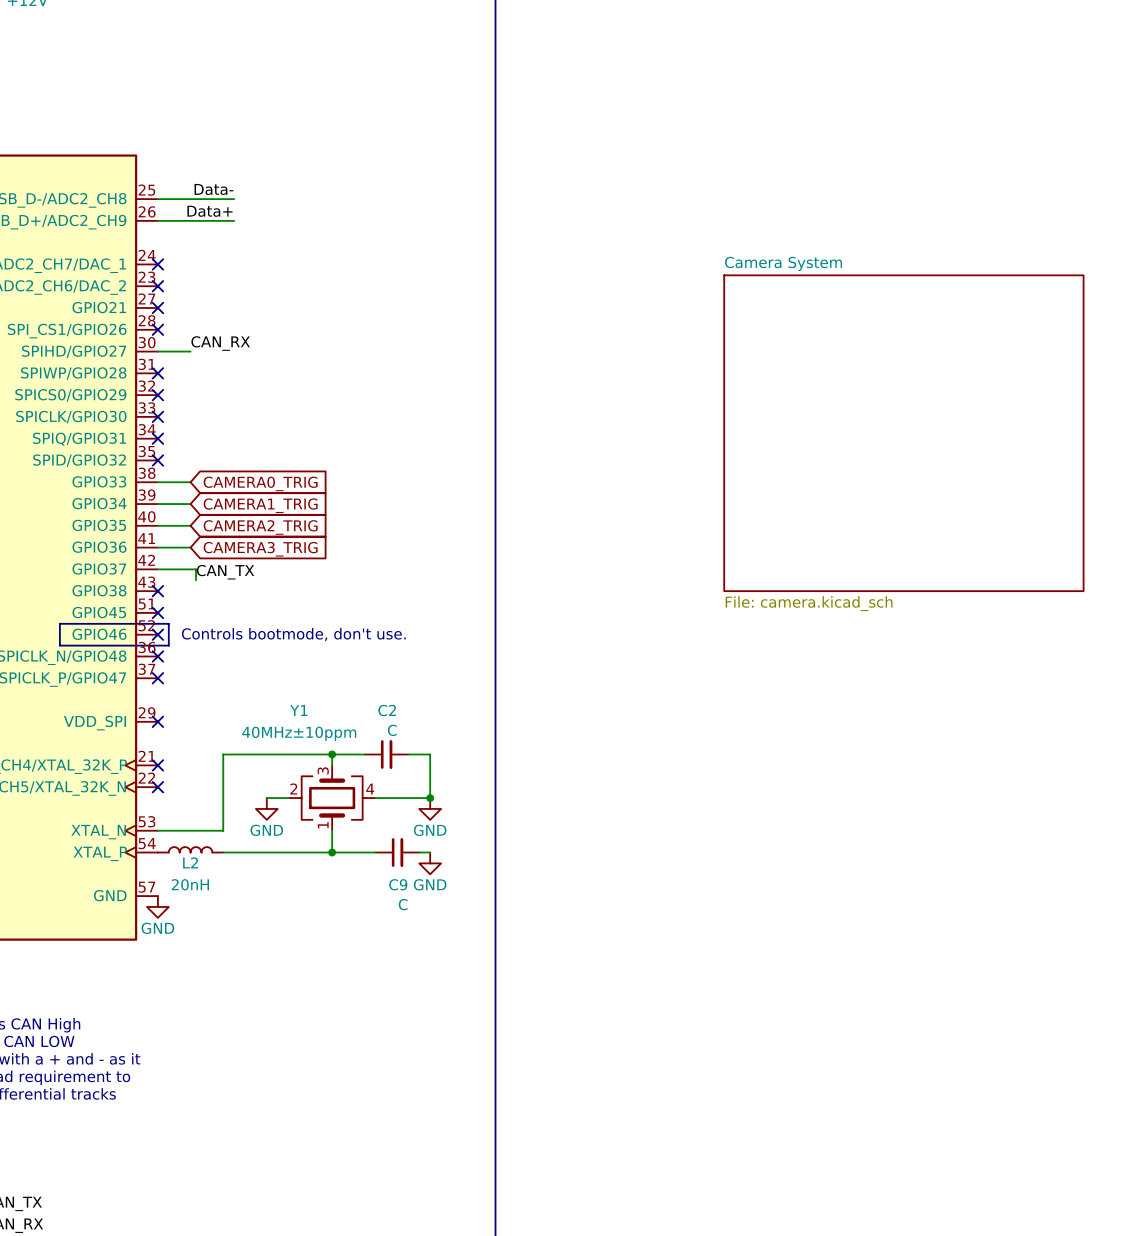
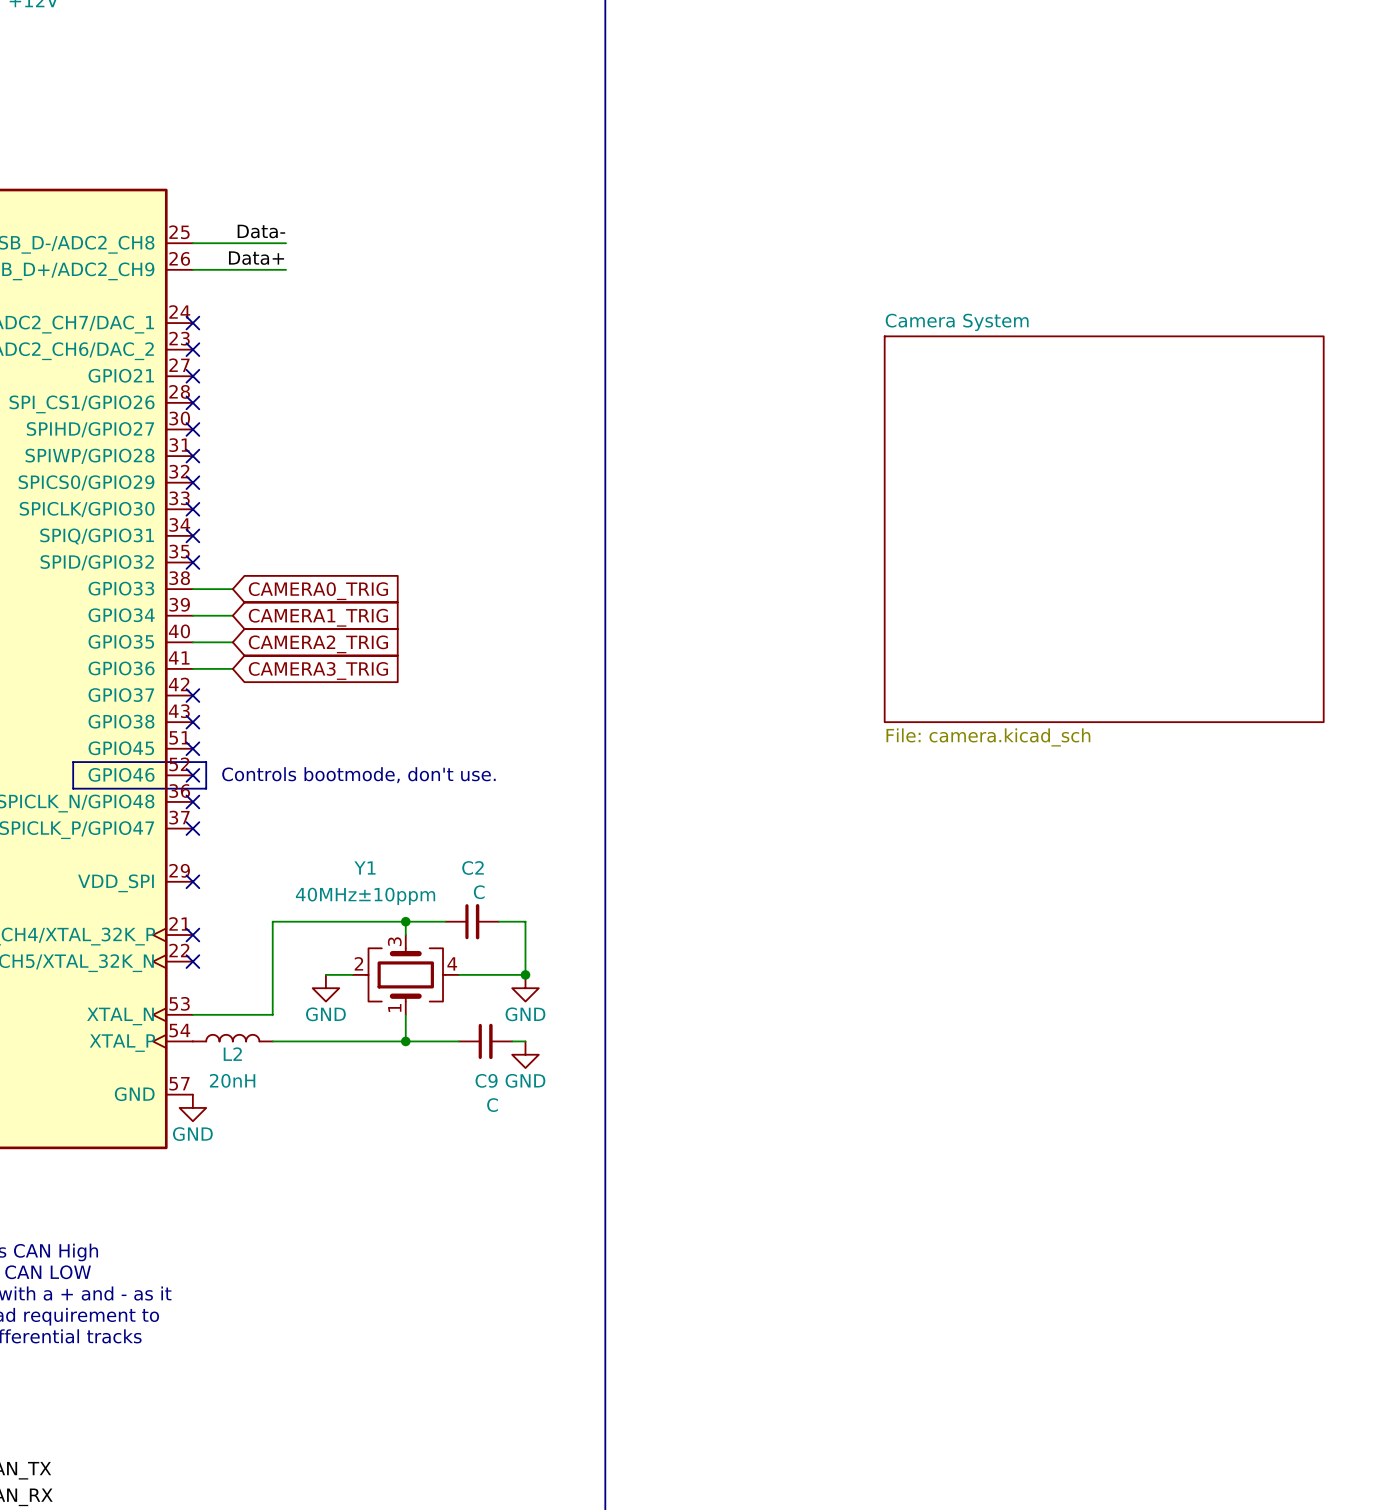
label: CAN_RX (220, 343) -> none
wire: (157, 351) (190, 351) -> none
no-connect mark: none -> (192, 429)
wire: (157, 569) (196, 569) (196, 580) -> none
no-connect mark: none -> (192, 695)
label: CAN_TX (225, 572) -> none

